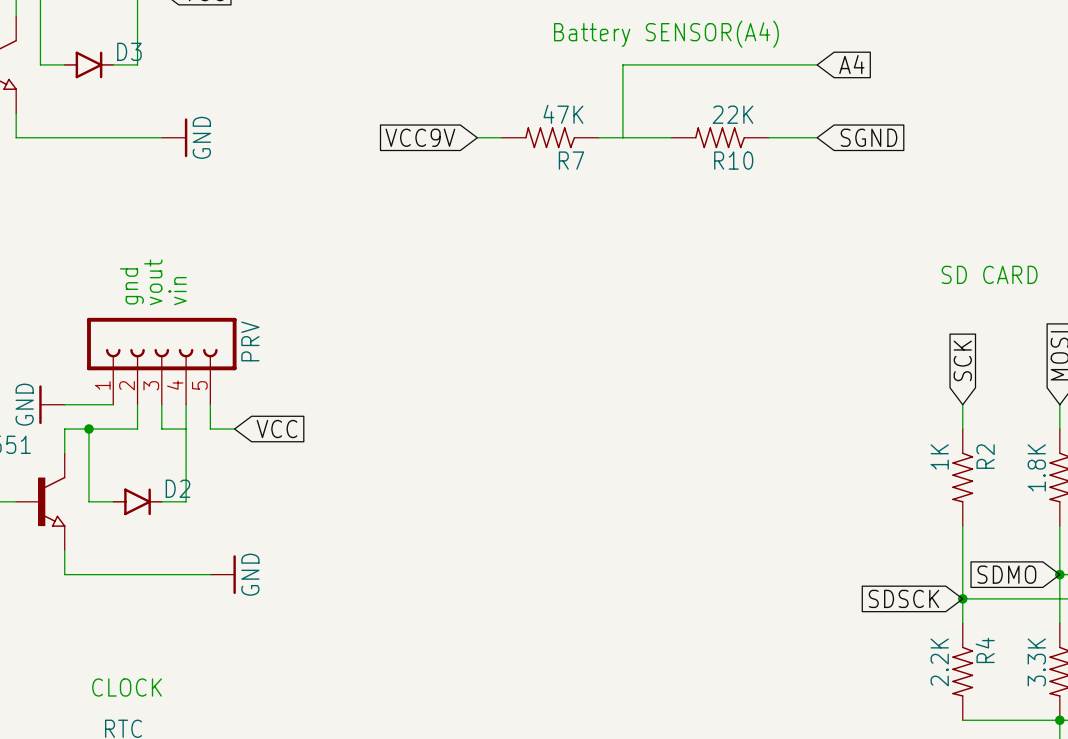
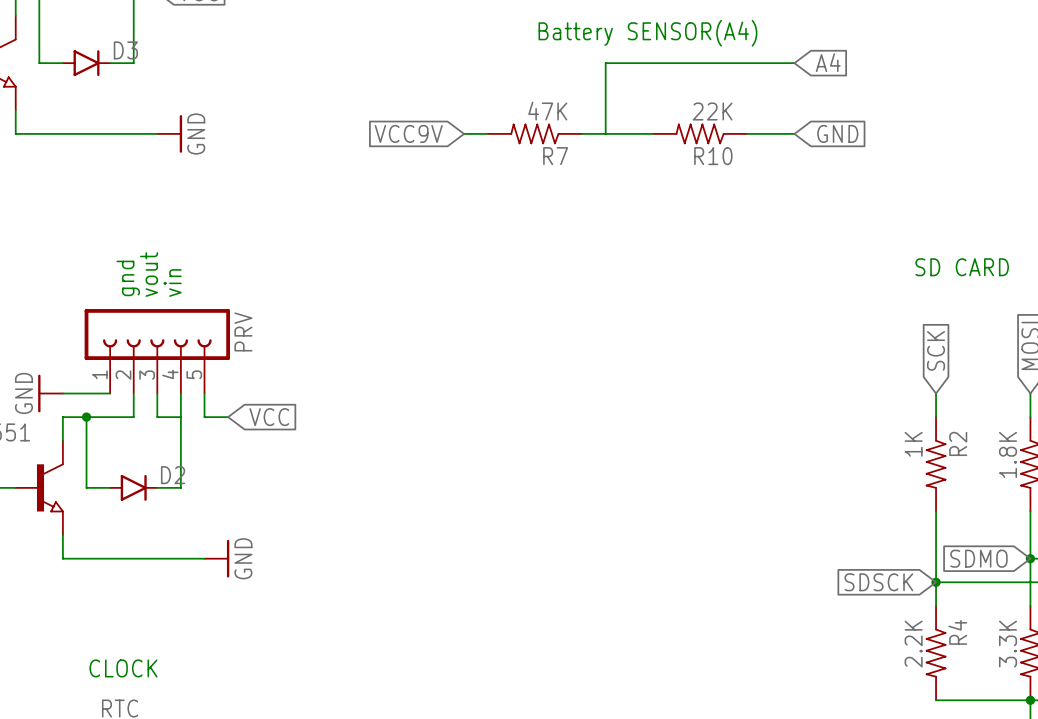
global label: SGND (869, 137) -> GND (837, 133)

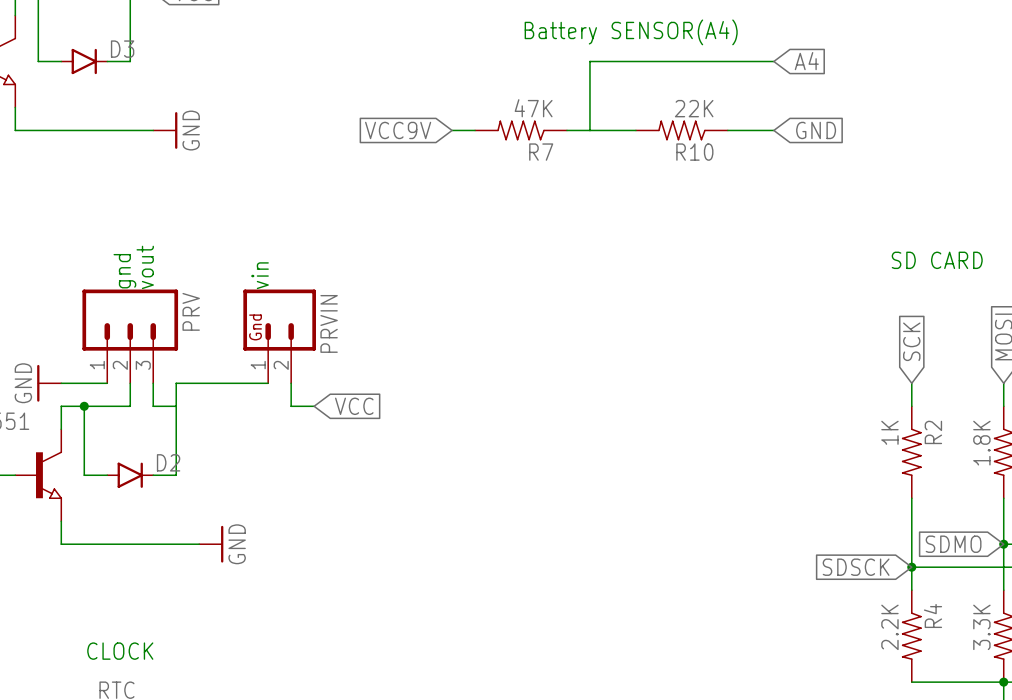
text position: vin (172, 283) -> vin (260, 275)
PRV: none -> (130, 336)
PRVIN: none -> (279, 336)
PRV: (157, 351) -> none
wire: none -> (176, 383) (268, 383)
wire: (204, 393) (204, 417) (228, 417) -> (291, 383) (291, 406) (314, 406)
global label position: VCC (269, 417) -> VCC (354, 406)

